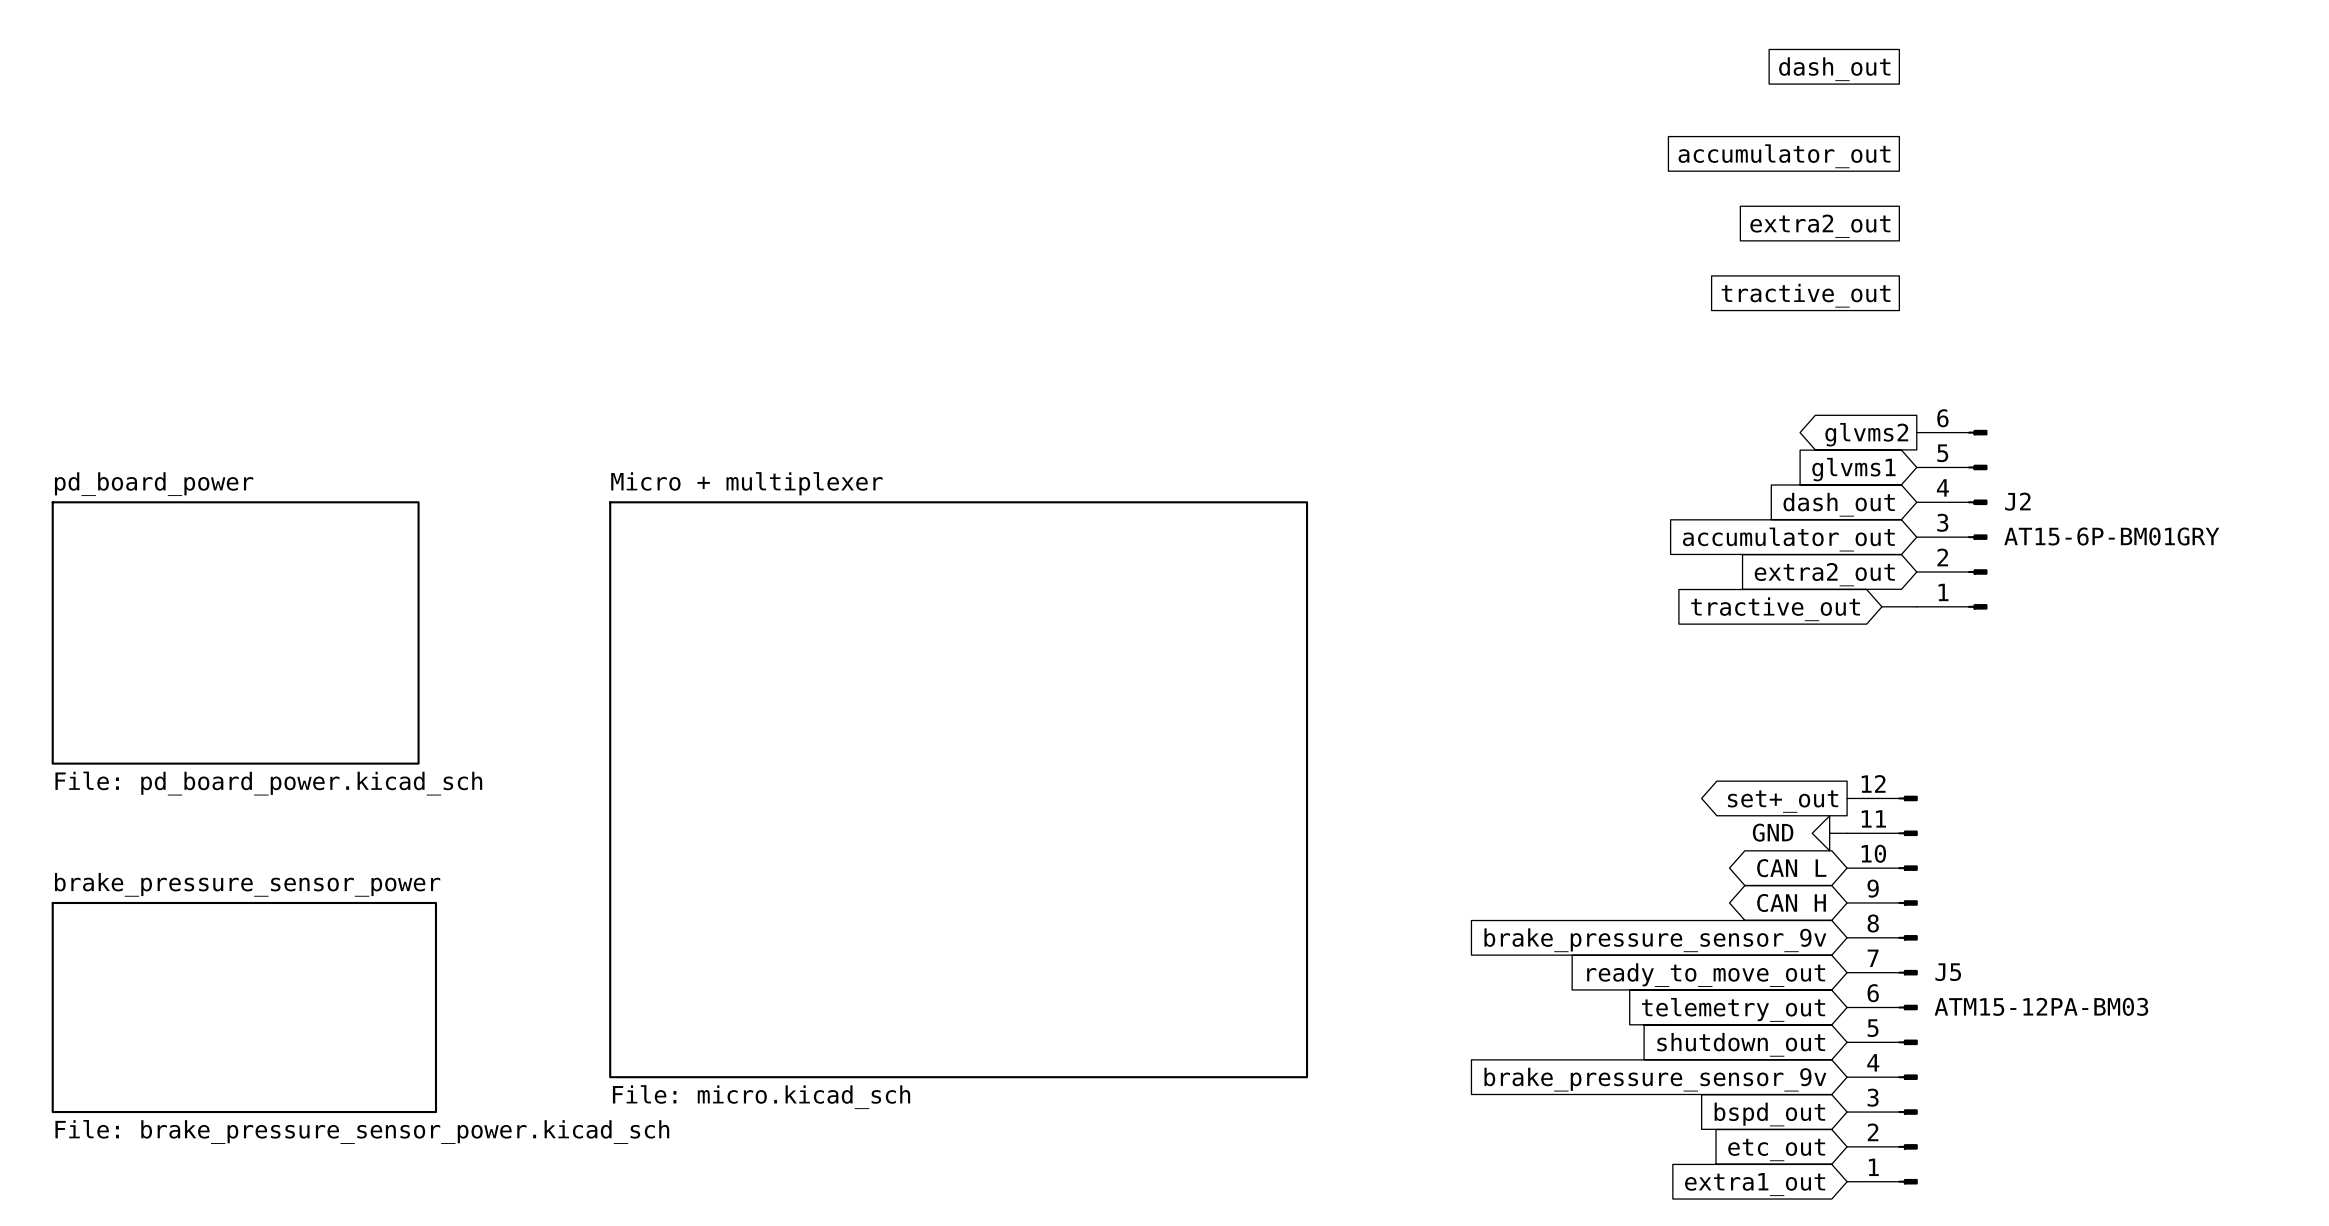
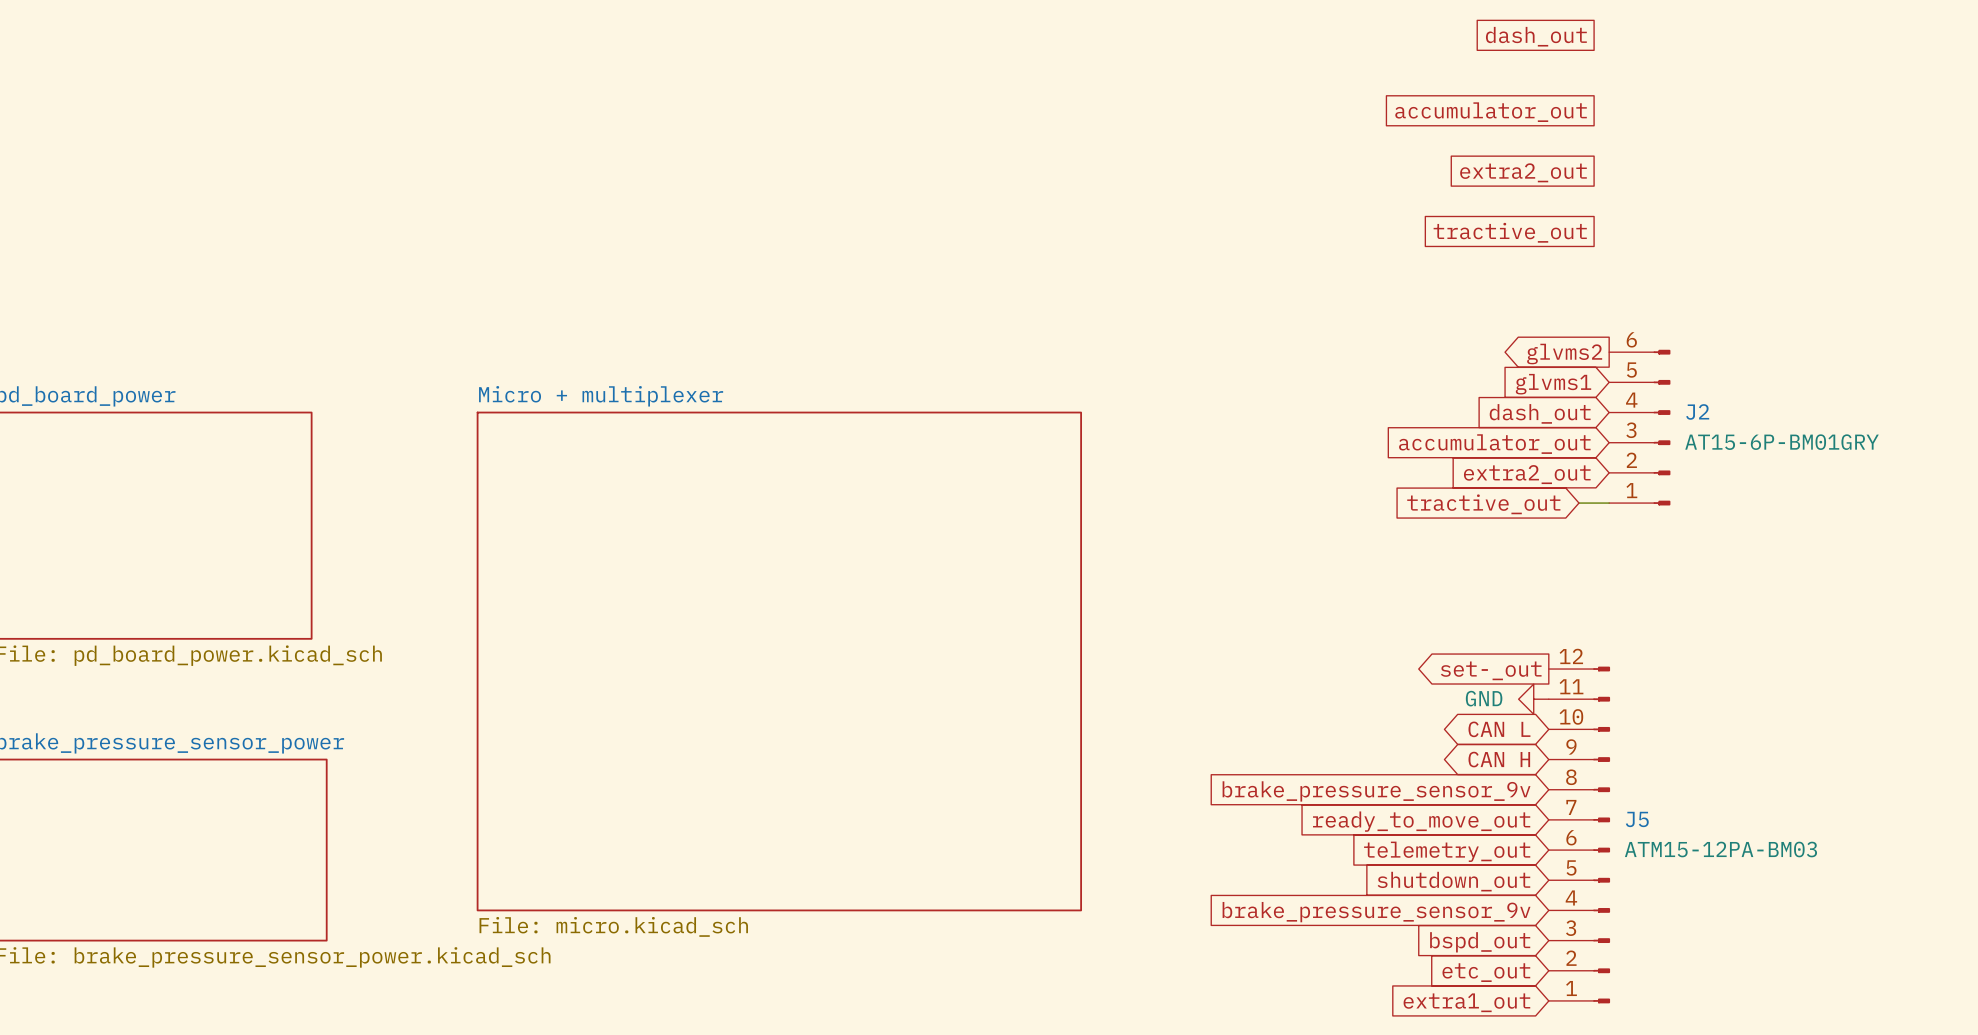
global label: set+_out (1783, 801) -> set-_out (1491, 670)

